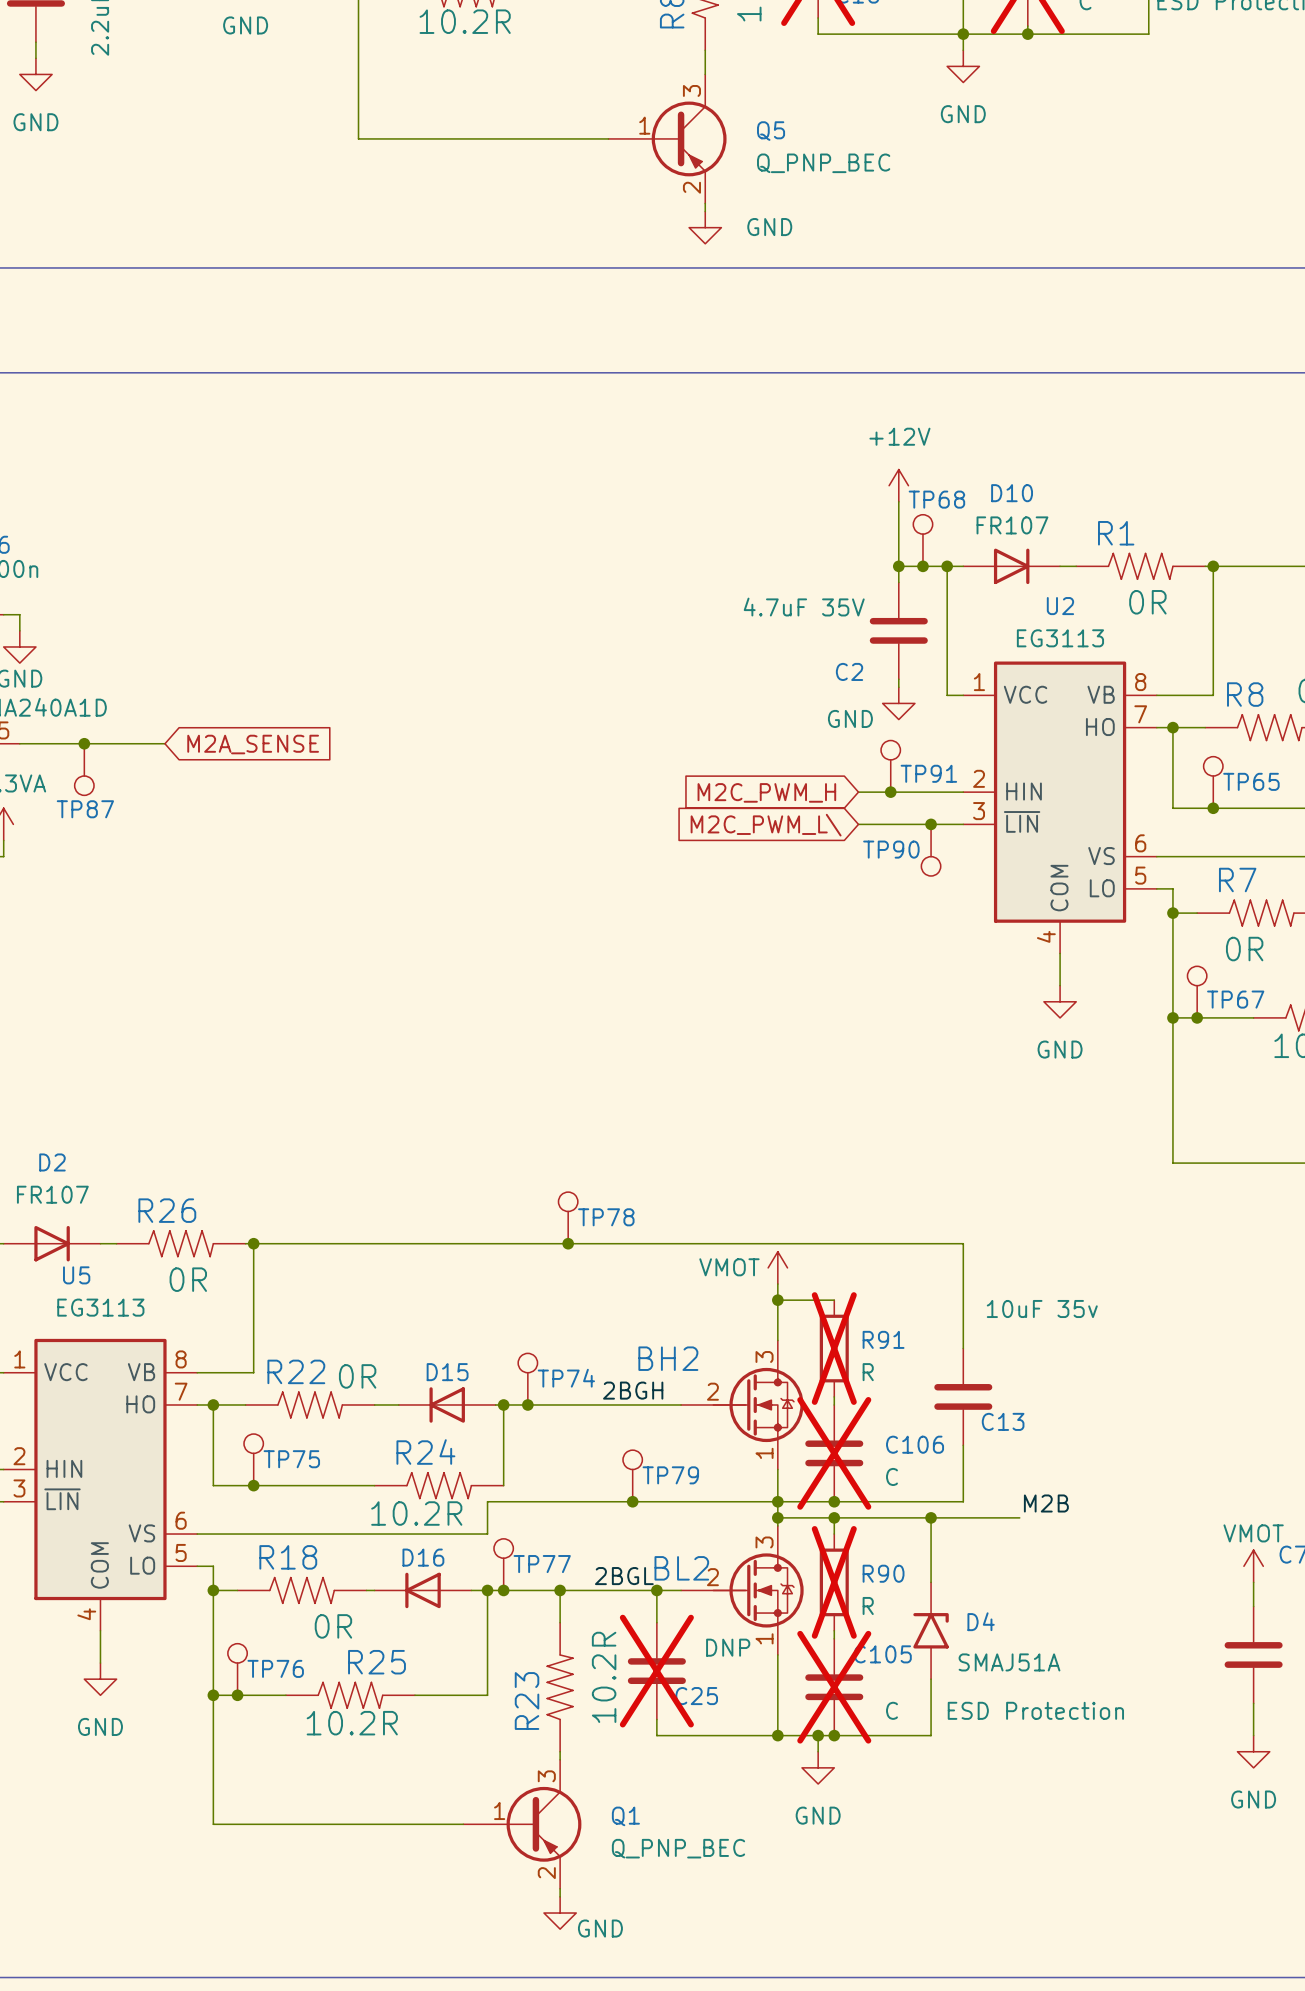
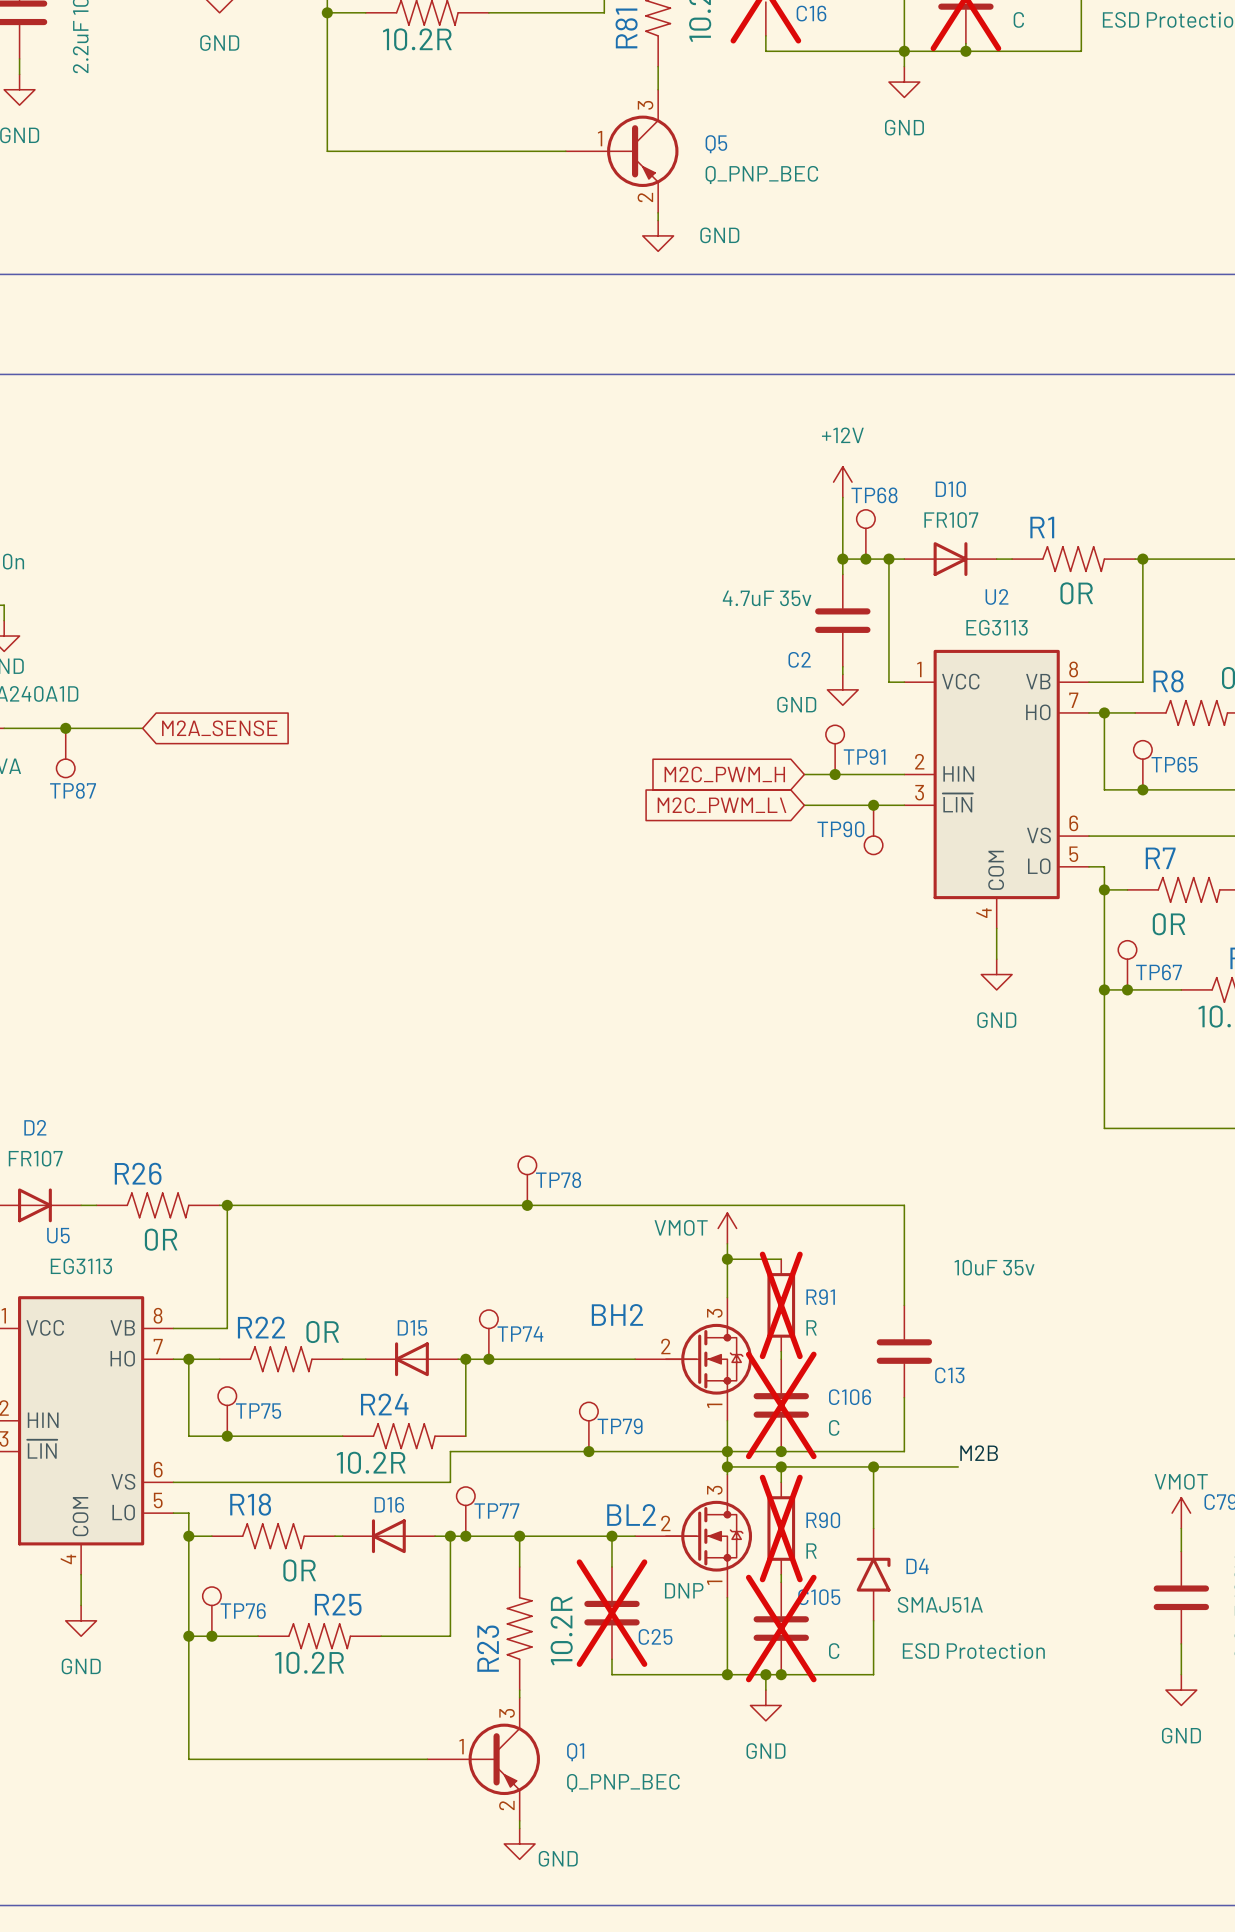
C2 value: 4.7uF 35V (804, 607) -> 4.7uF 35v (767, 598)
label: 2BGH (633, 1390) -> none
label: 2BGL (624, 1576) -> none

